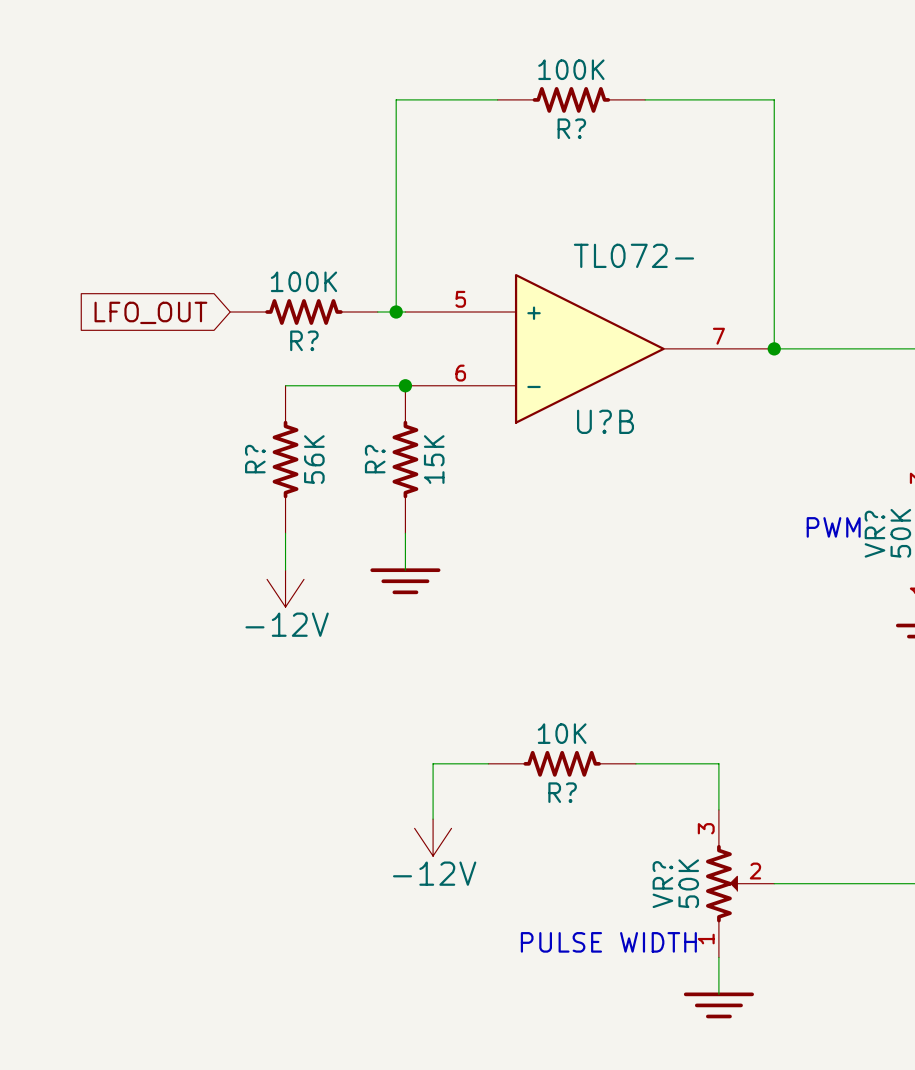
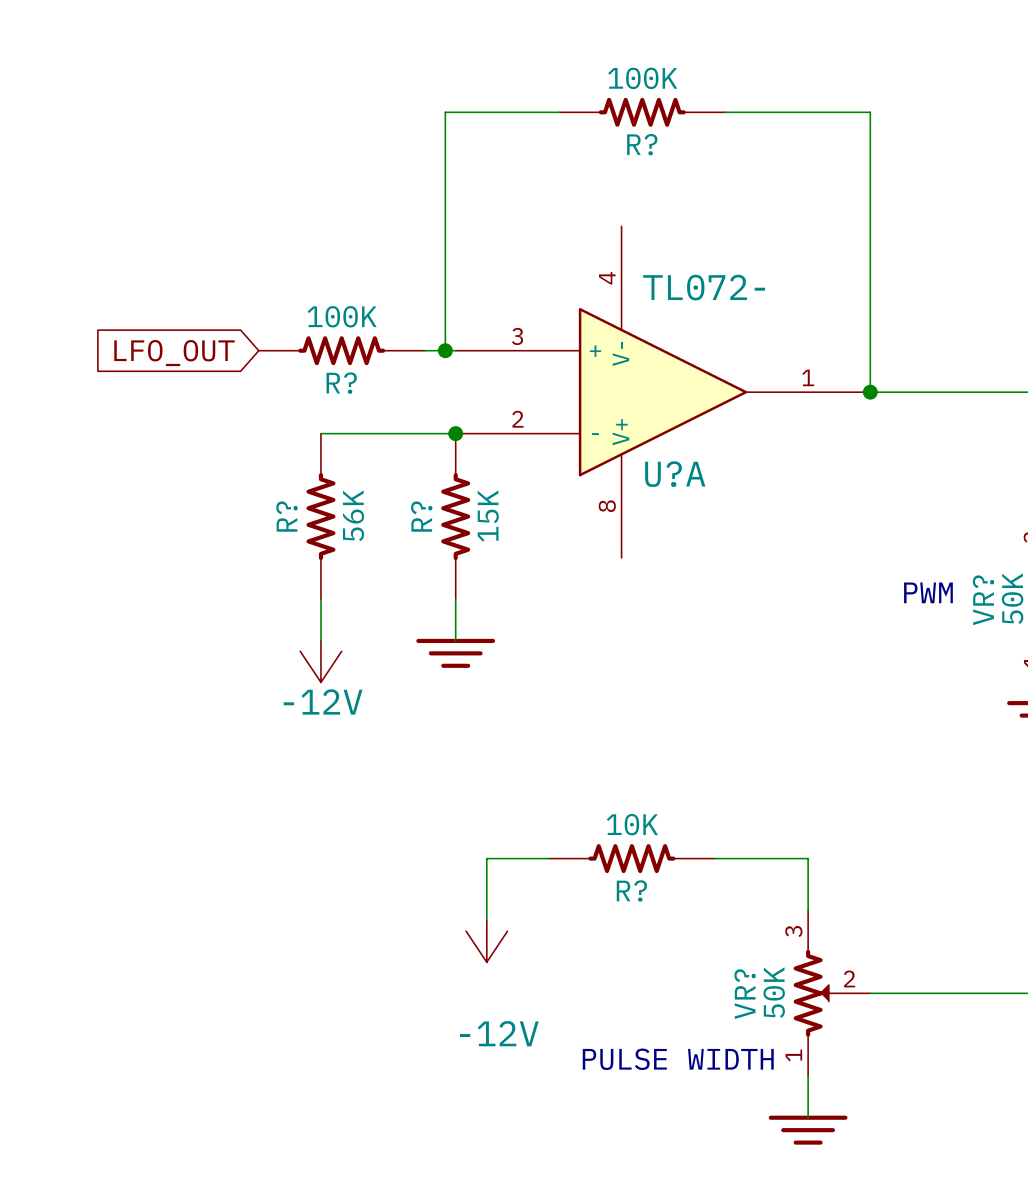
U?B: TL072- (589, 348) -> none
U?A: none -> TL072- (663, 392)
power symbol text position: -12V (434, 873) -> -12V (499, 1033)

